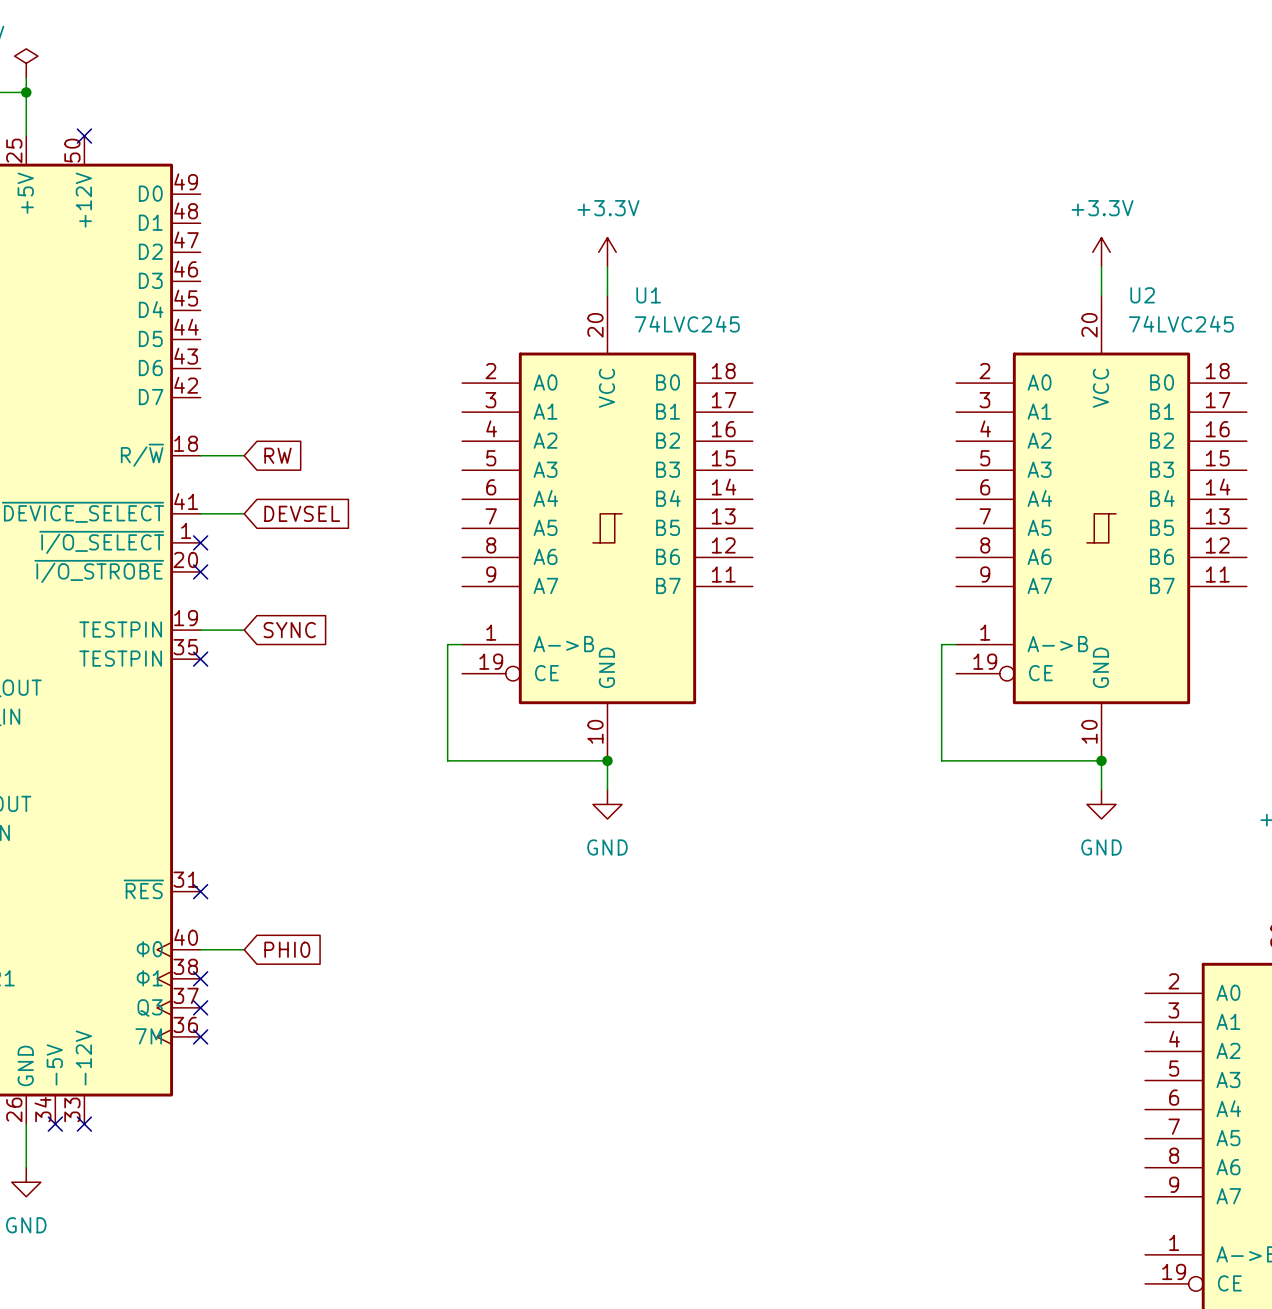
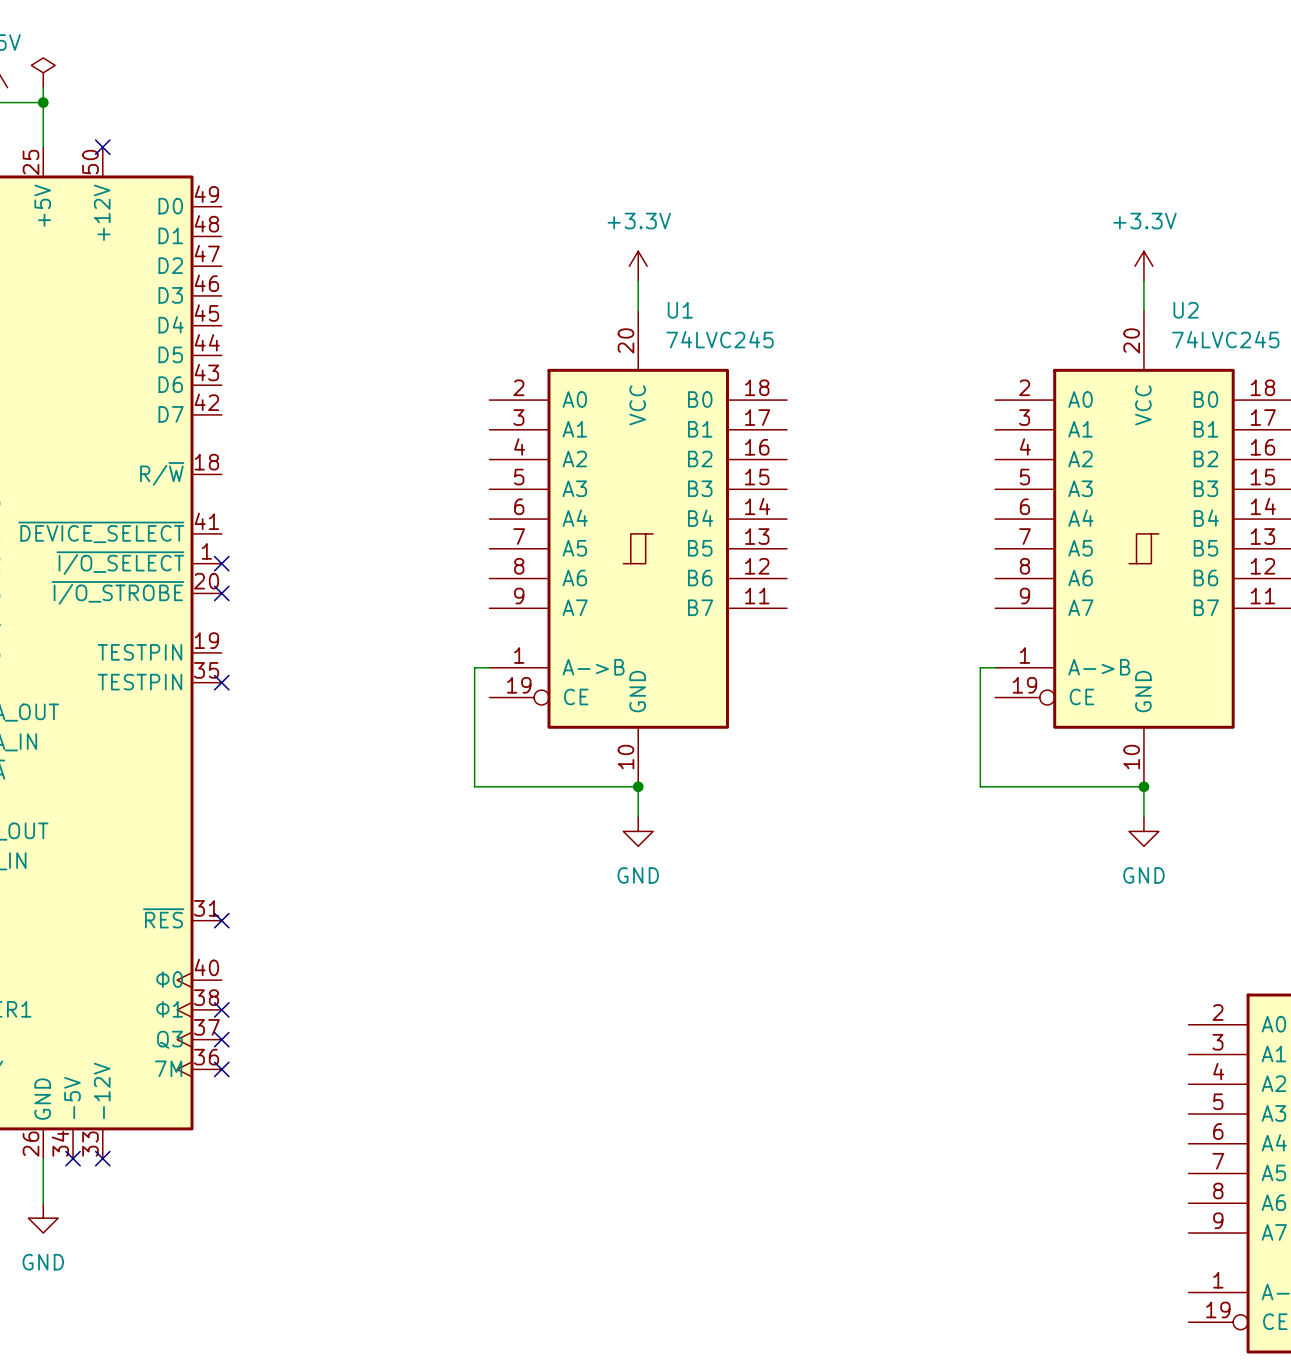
wire: (200, 455) (244, 455) -> none
global label: RW (277, 455) -> none
wire: (200, 513) (244, 513) -> none
global label: DEVSEL (302, 513) -> none
wire: (200, 630) (244, 630) -> none
global label: SYNC (289, 630) -> none
wire: (200, 949) (244, 949) -> none
global label: PHI0 (287, 949) -> none

